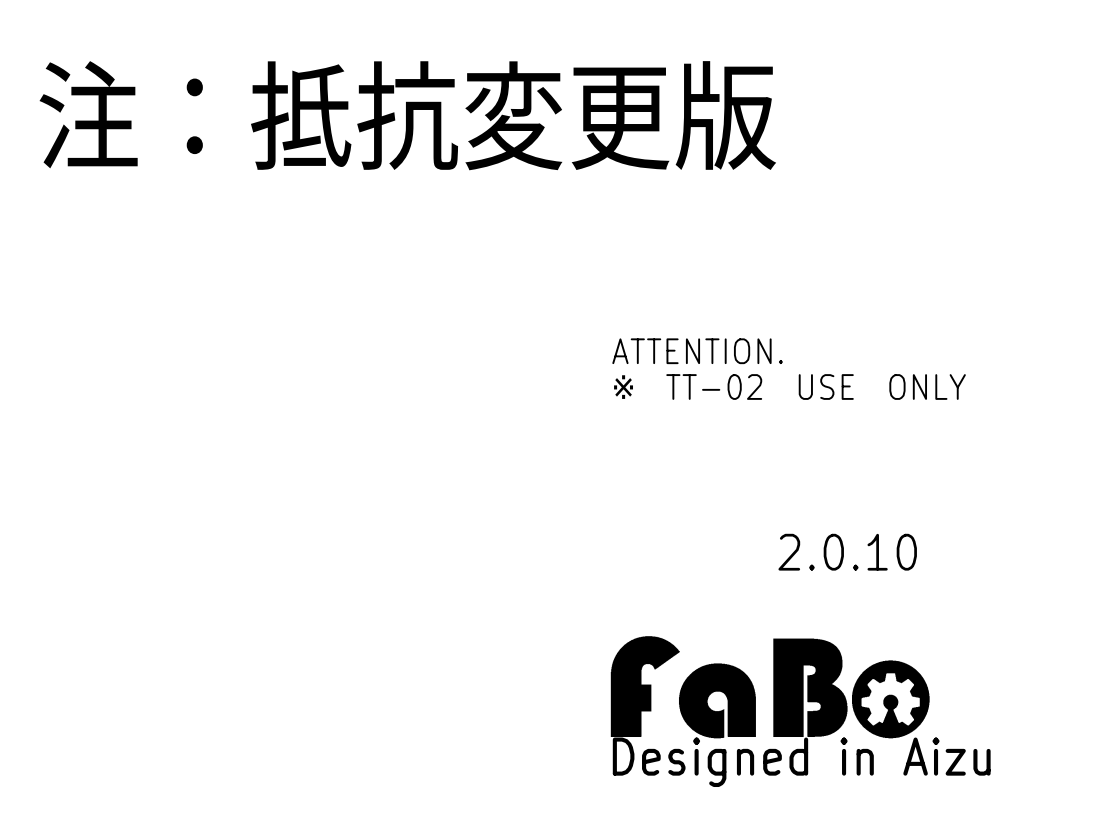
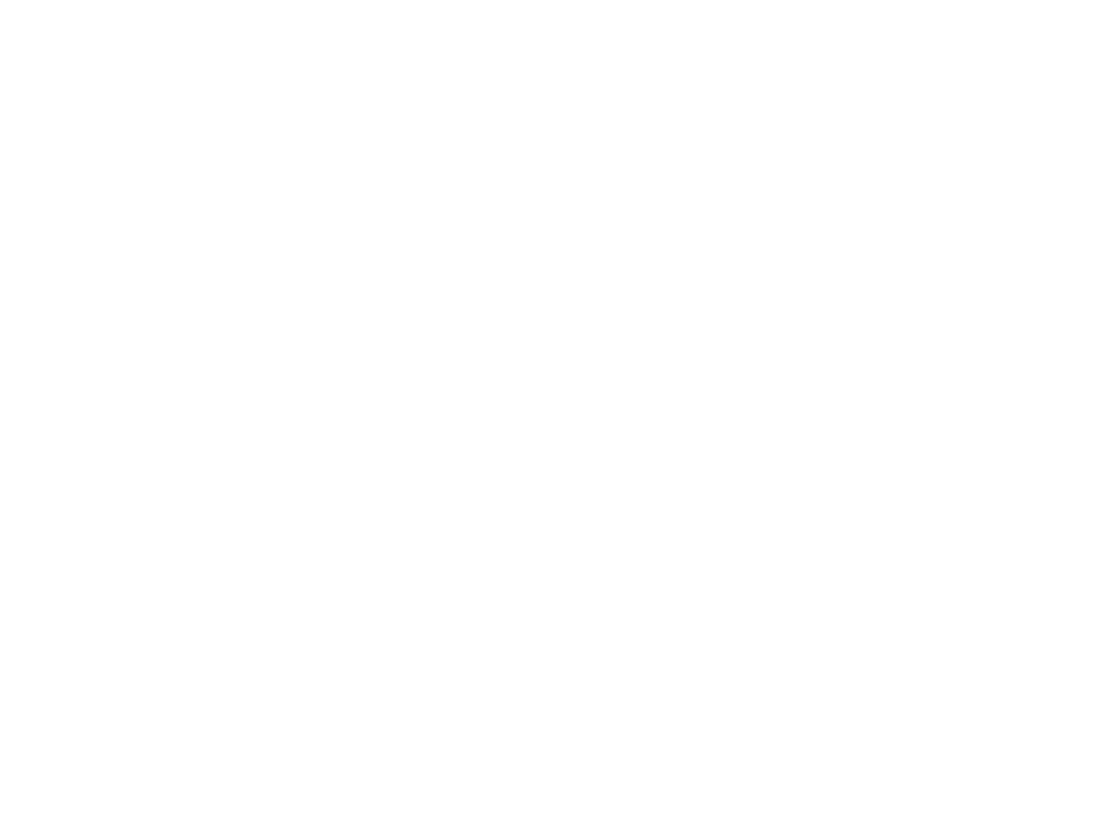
text: 注：抵抗変更版 (407, 115) -> none
text: ATTENTION. (697, 351) -> none
text: ※ TT-02 USE ONLY (789, 387) -> none
text: 2.0.10 (847, 552) -> none
part: (770, 687) -> none

